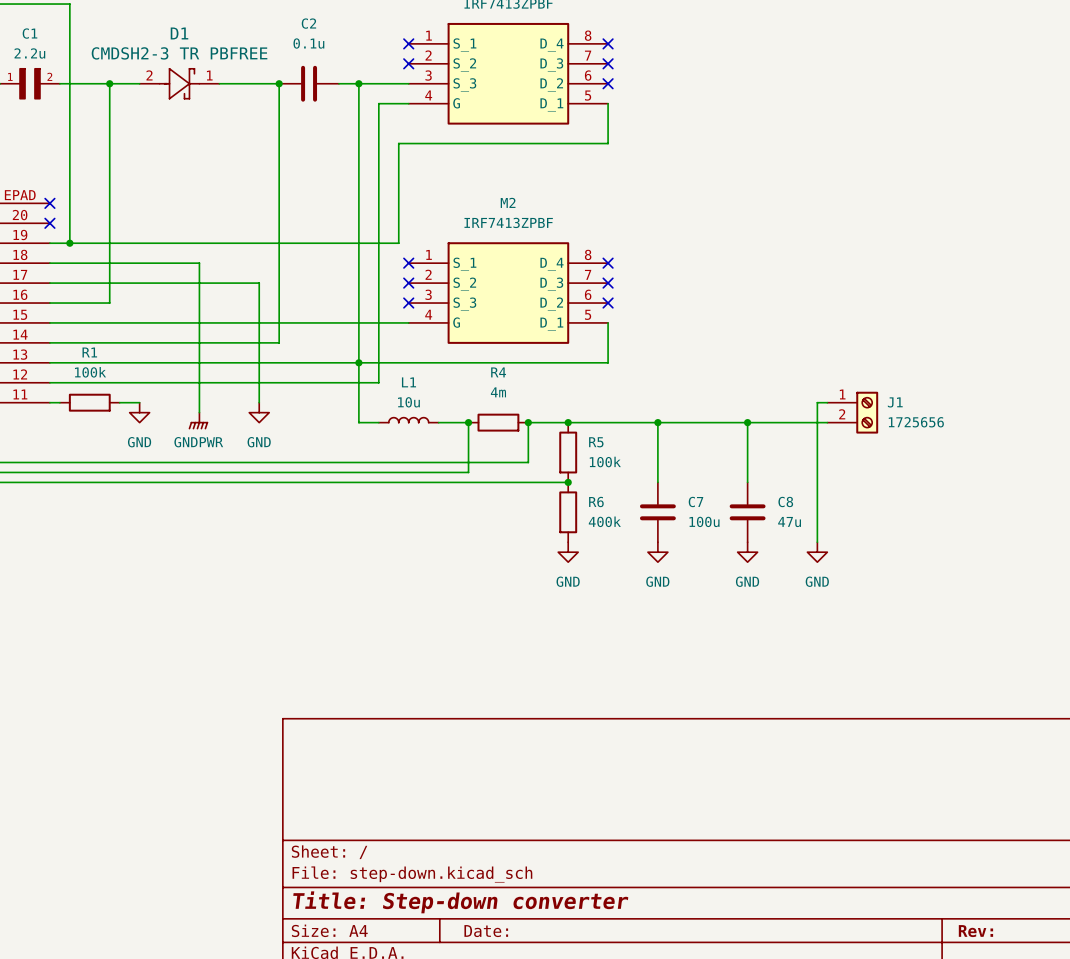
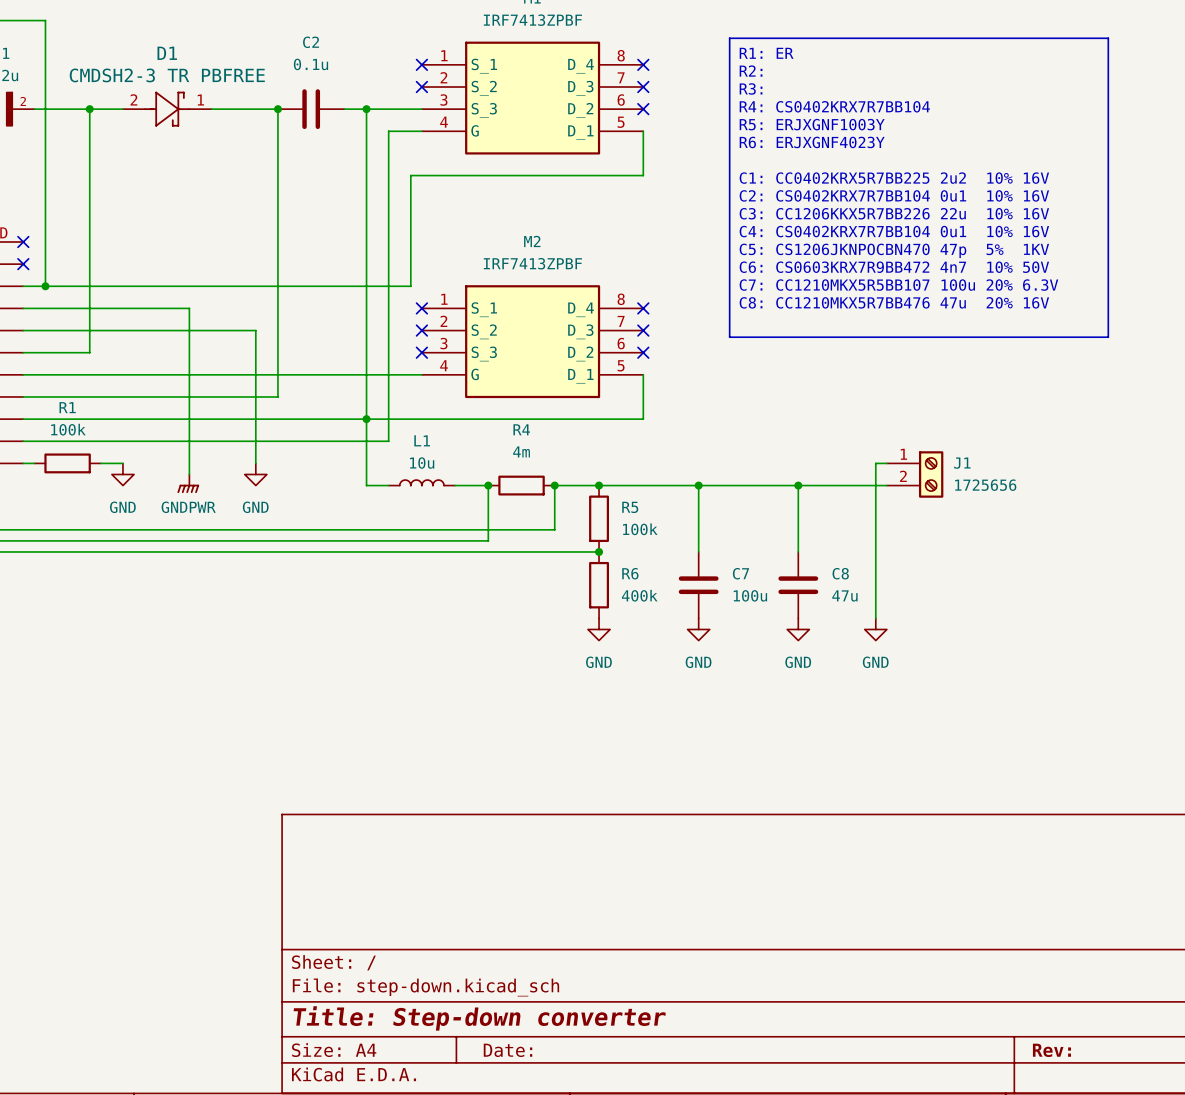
line: none -> (729, 38) (1108, 38) (1108, 337) (729, 337) (729, 38)
text: none -> R1: ER (766, 53)
text: none -> R2: (751, 71)
text: none -> R3: (751, 88)
text: none -> R4: CS0402KRX7R7BB104 (834, 106)
text: none -> R5: ERJXGNF1003Y (812, 124)
text: none -> R6: ERJXGNF4023Y (812, 142)
text: none -> C1: CC0402KRX5R7BB225 2u2 10% 16V (894, 178)
text: none -> C2: CS0402KRX7R7BB104 0u1 10% 16V (894, 195)
text: none -> C3: CC1206KKX5R7BB226 22u 10% 16V (894, 213)
text: none -> C4: CS0402KRX7R7BB104 0u1 10% 16V (894, 231)
text: none -> C5: CS1206JKNPOCBN470 47p 5% 1KV (894, 250)
text: none -> C6: CS0603KRX7R9BB472 4n7 10% 50V (894, 267)
text: none -> C7: CC1210MKX5R5BB107 100u 20% 6.3V (898, 285)
text: none -> C8: CC1210MKX5R7BB476 47u 20% 16V (894, 302)

